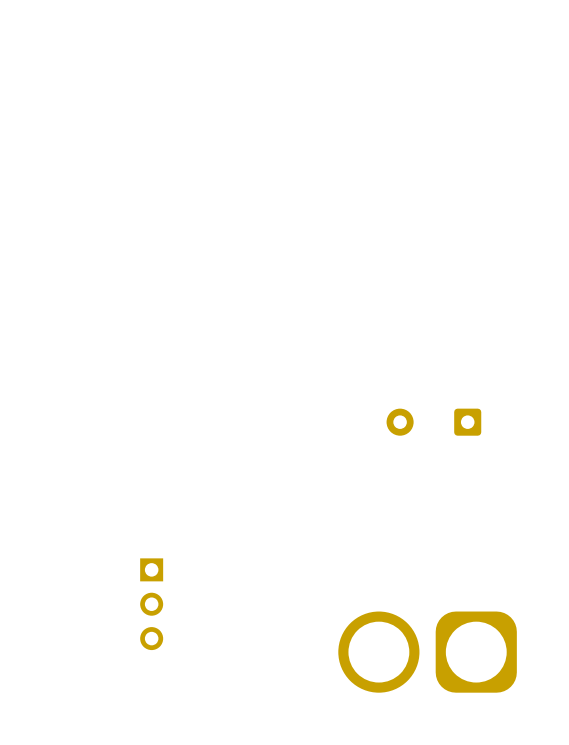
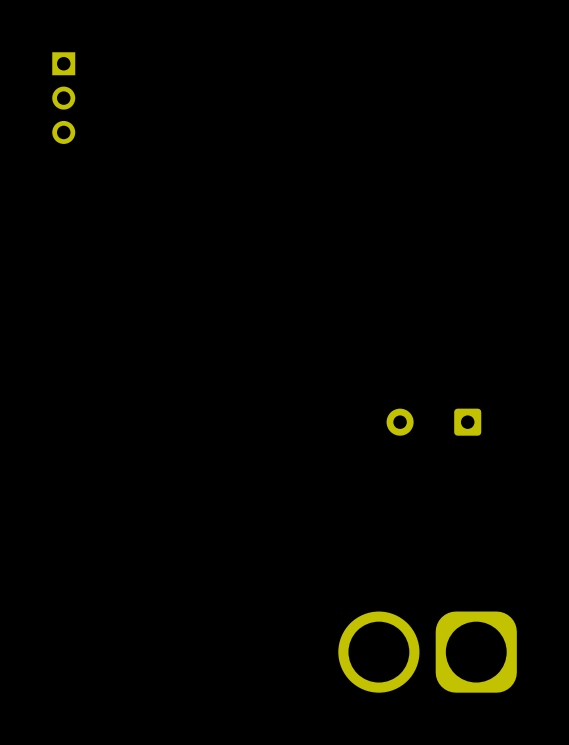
part: none -> (63, 98)
part: (151, 604) -> none

